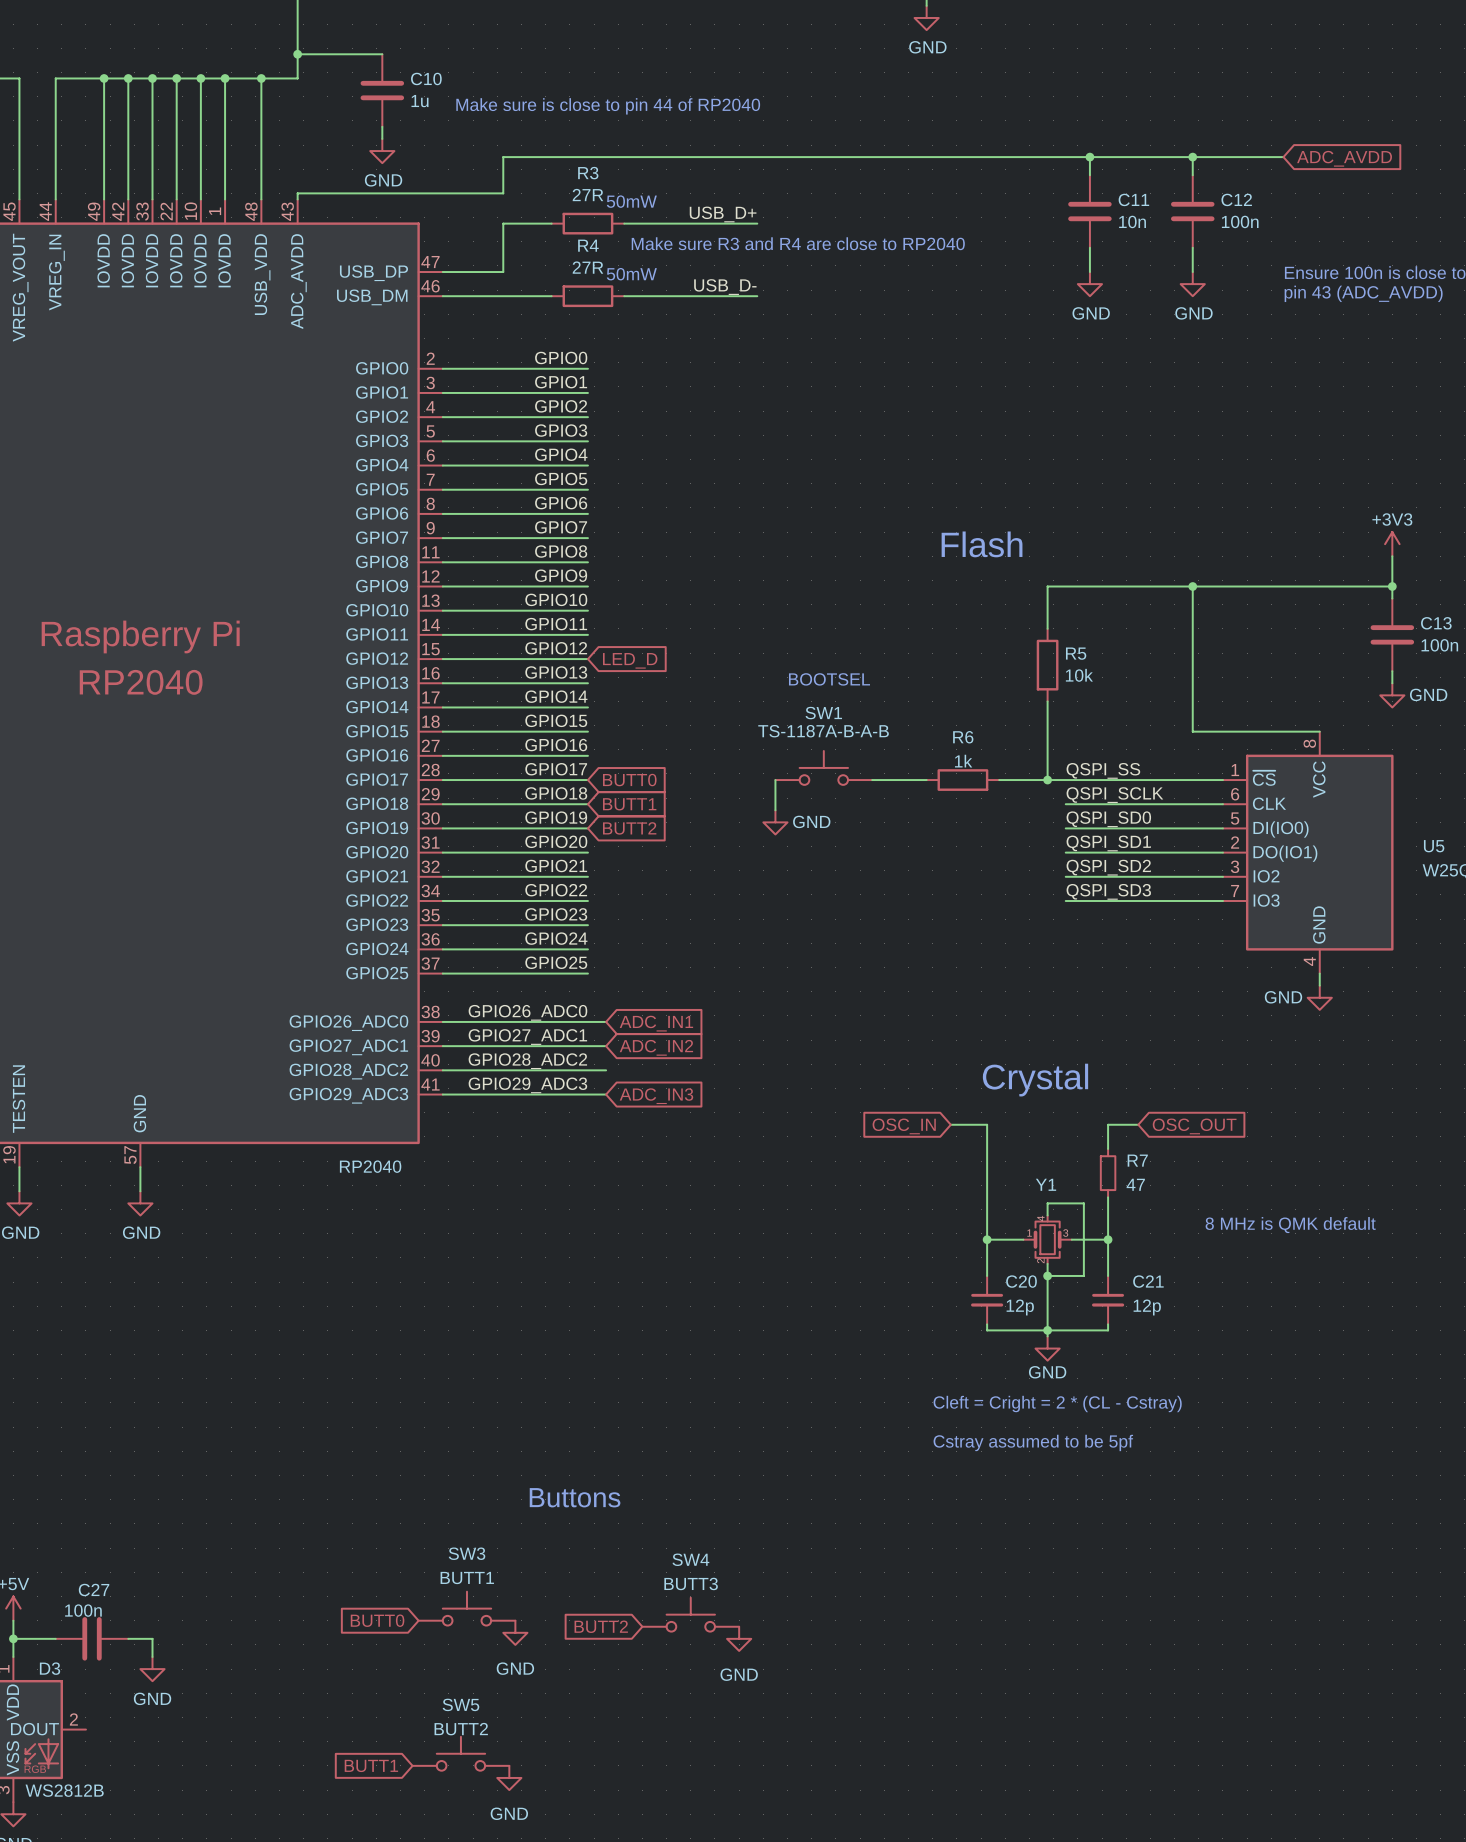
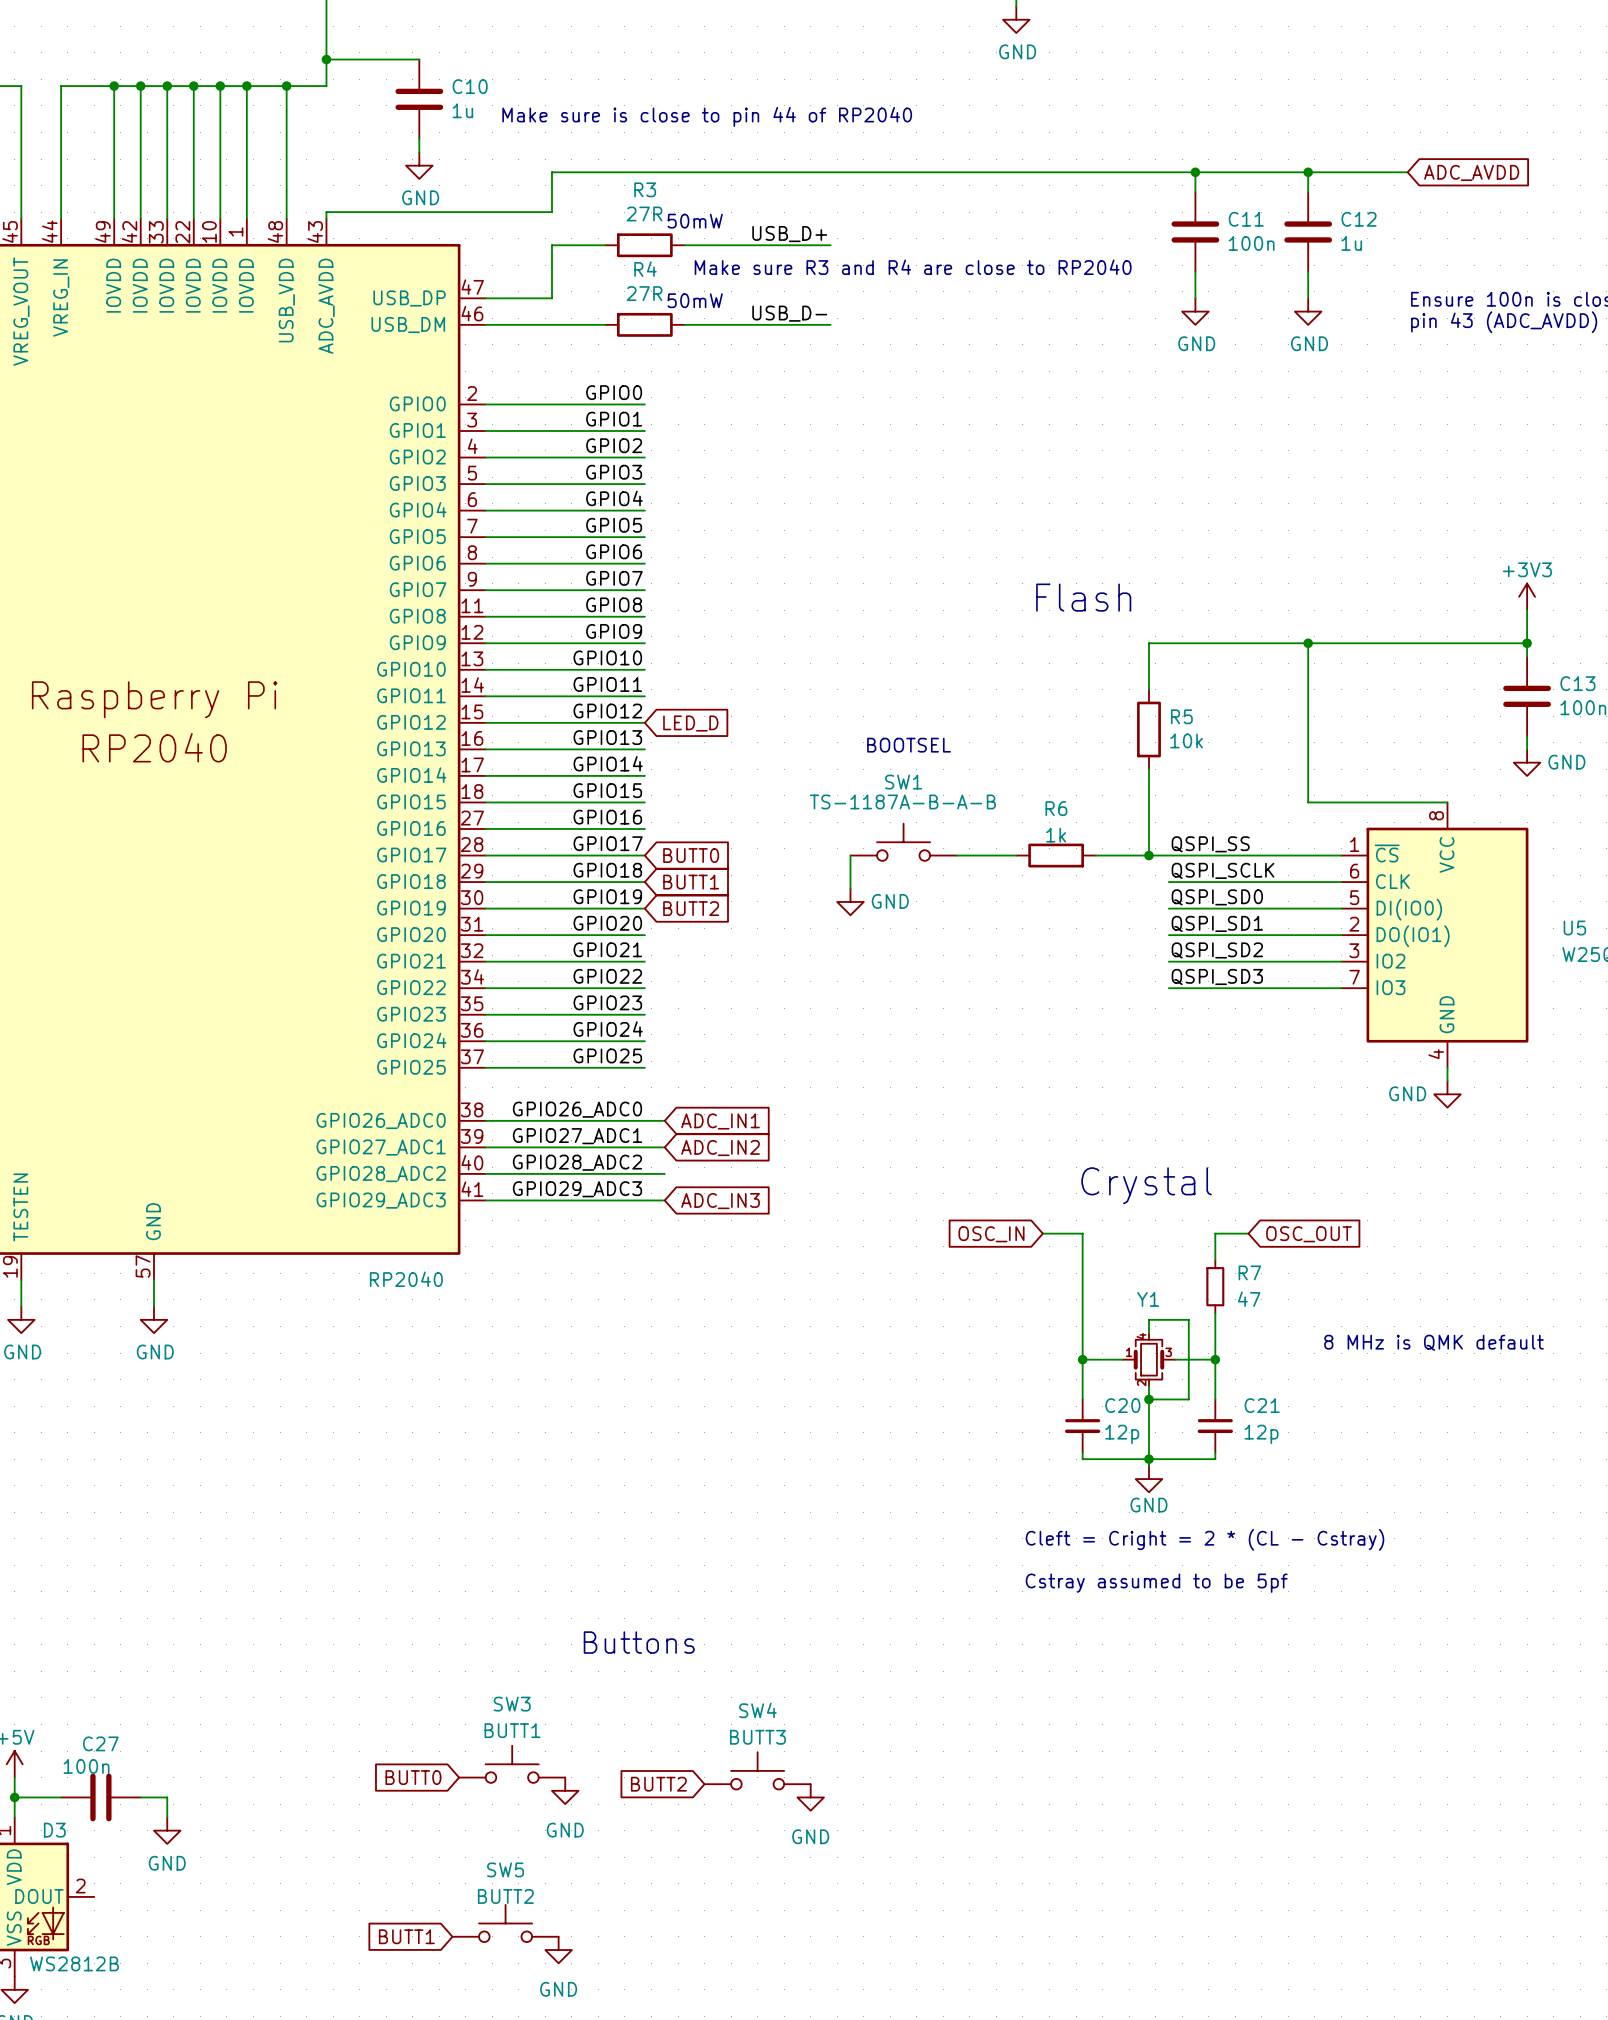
C11 value: 10n (1132, 221) -> 100n (1251, 243)
C12 value: 100n (1240, 221) -> 1u (1351, 243)

